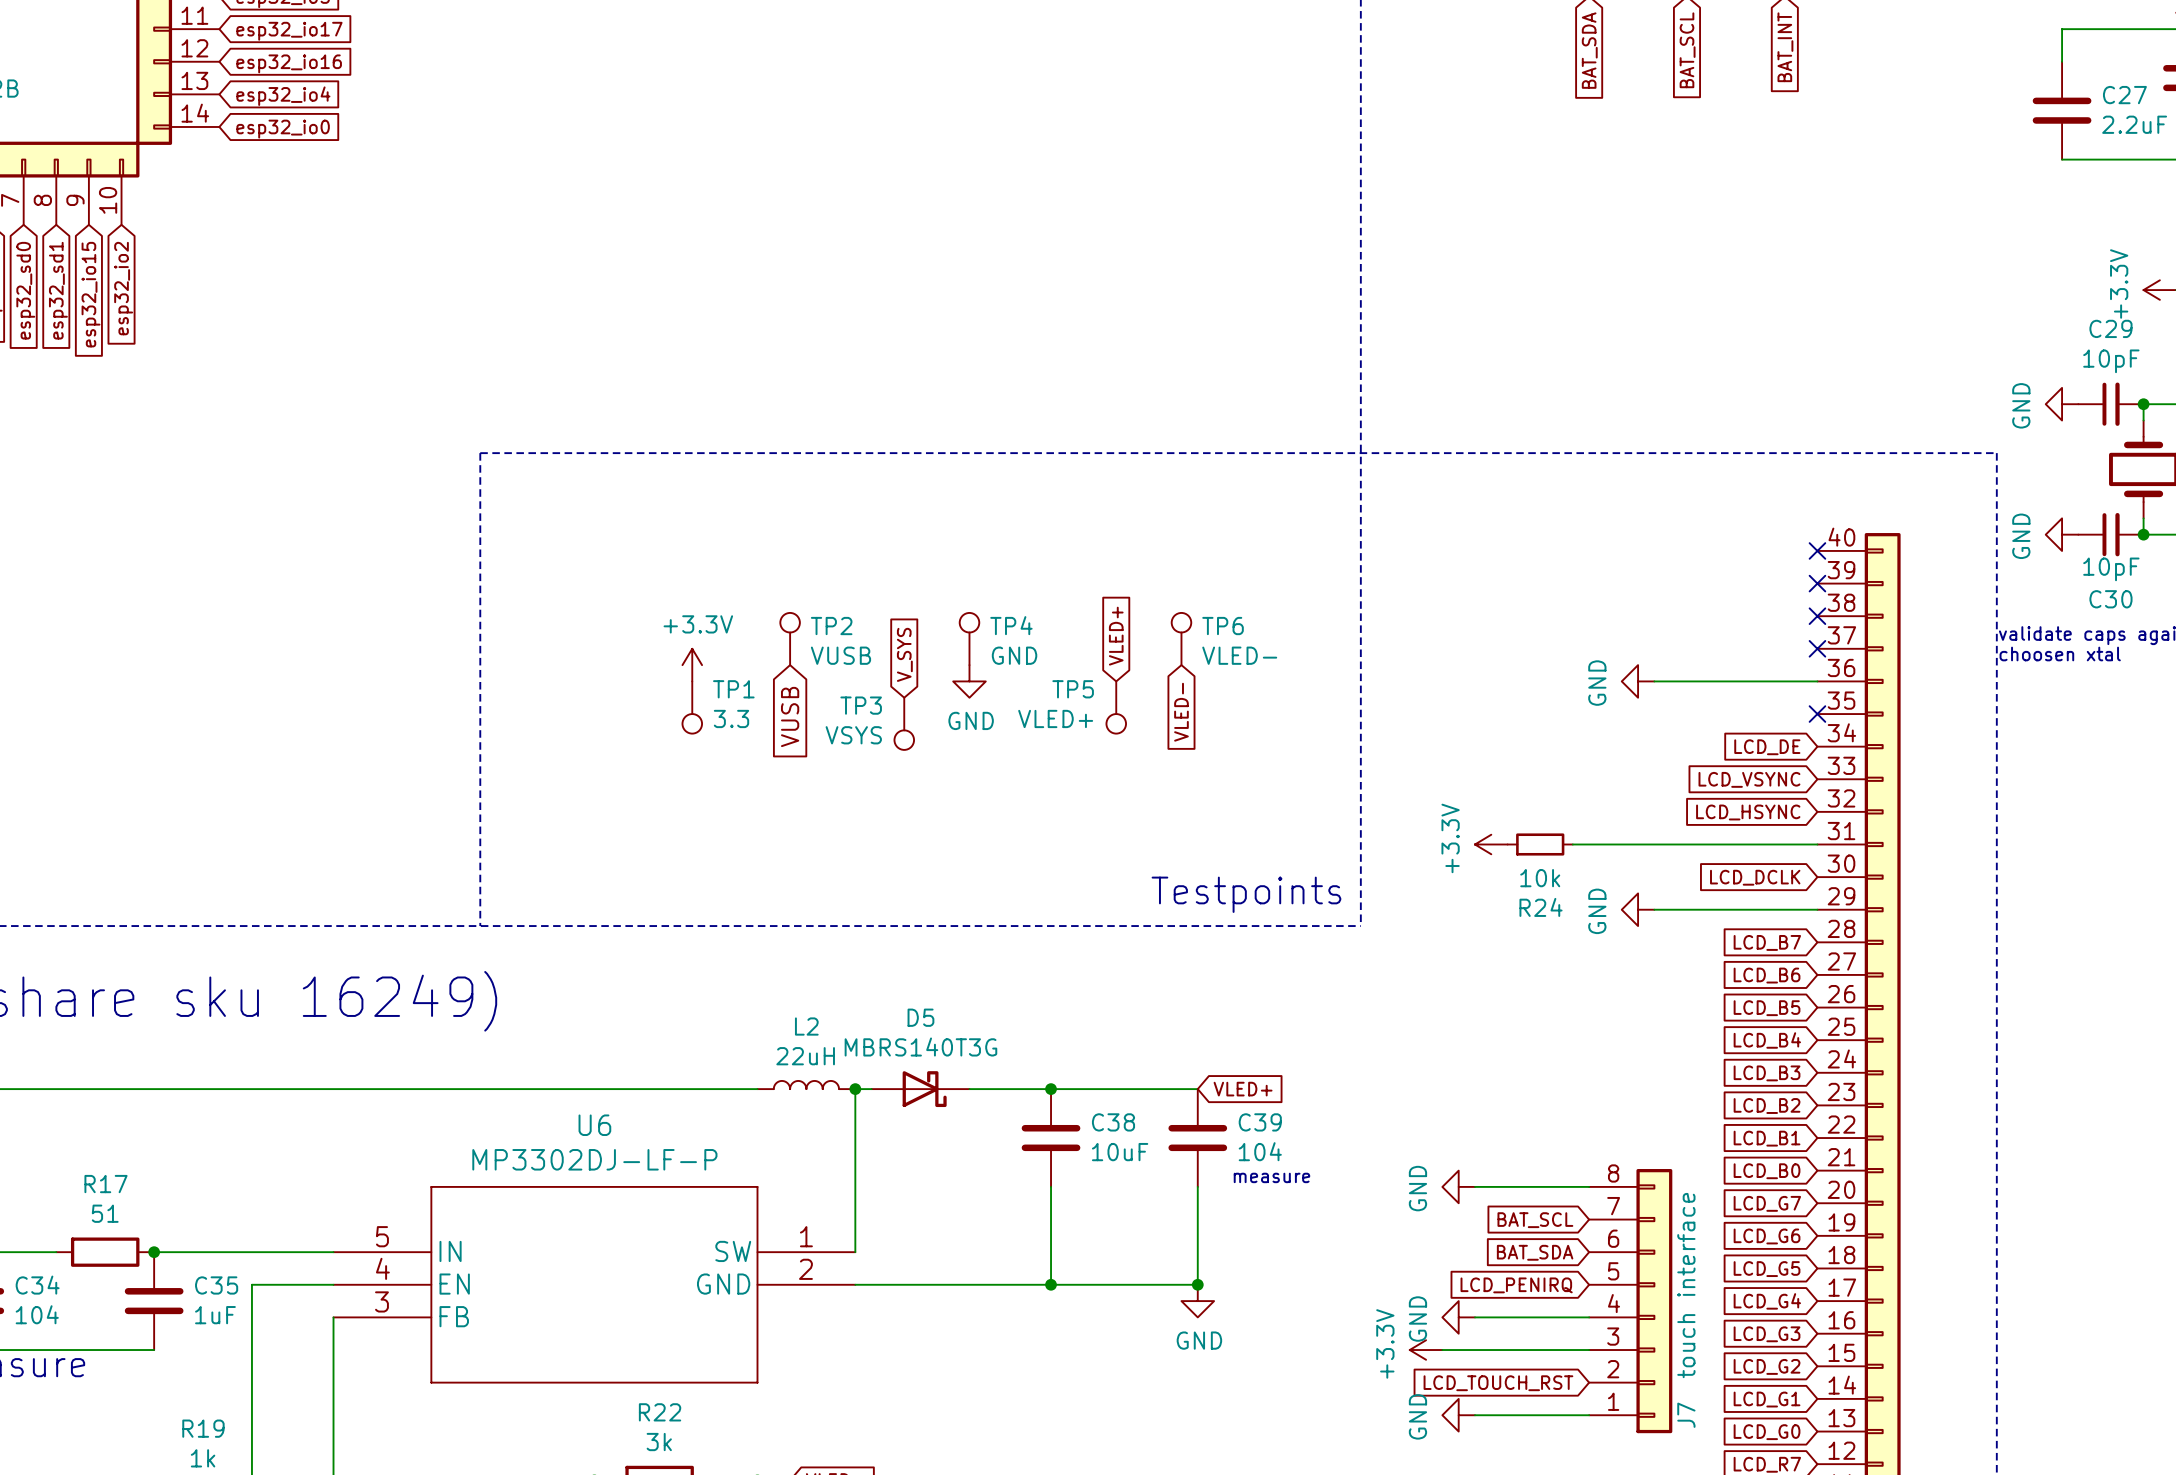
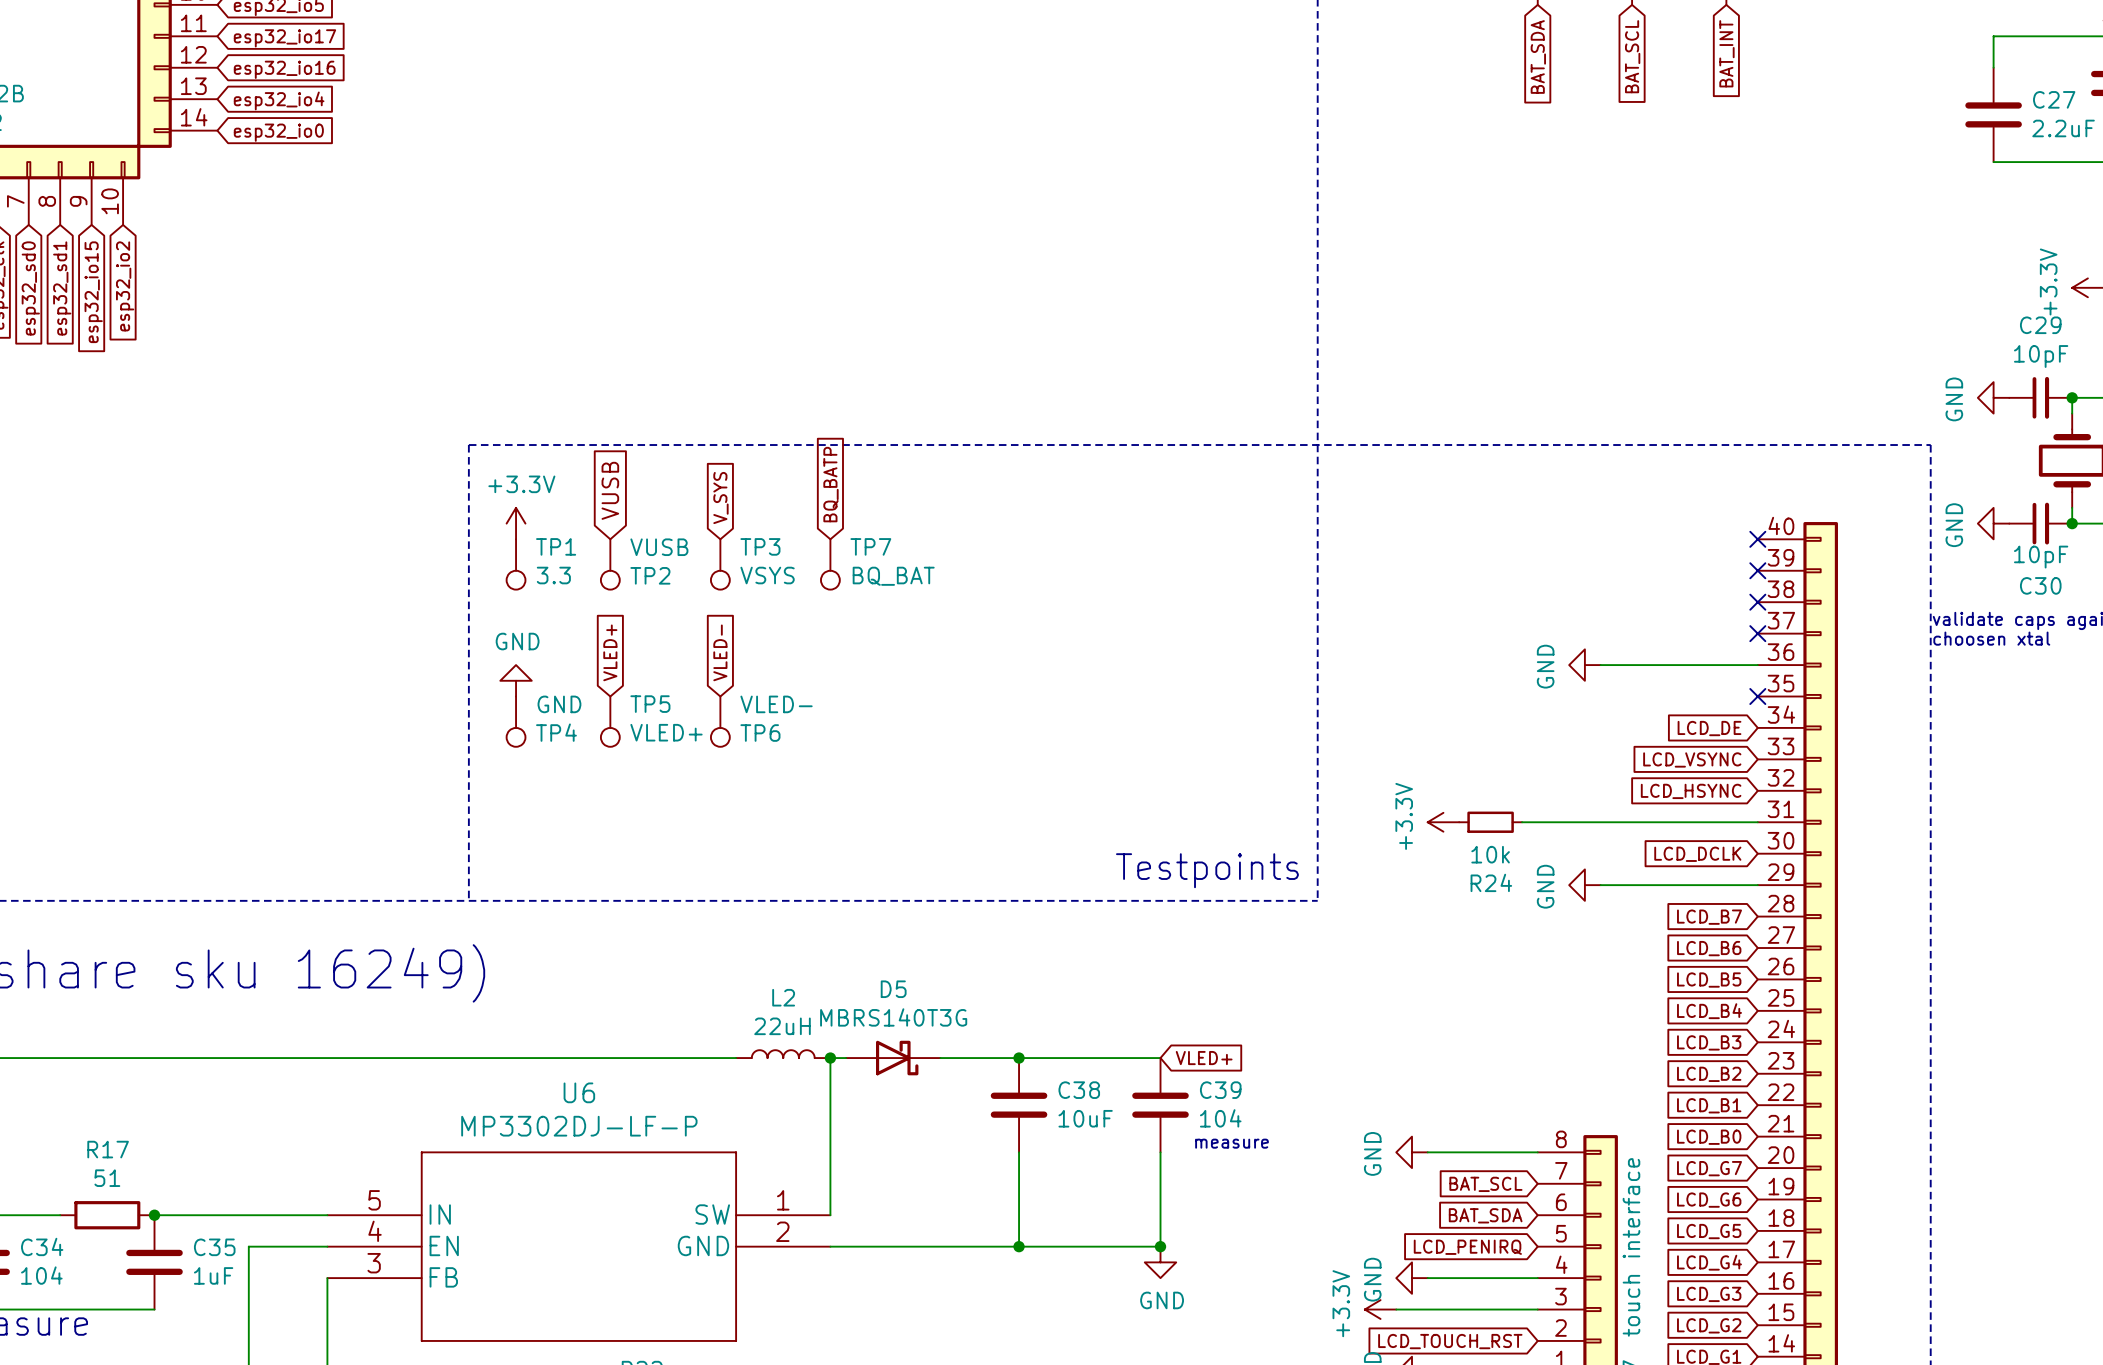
global label: none -> BQ_BATP (830, 484)
TP7: none -> BQ_BAT (830, 564)
TP2 rotation: 0° (790, 622) -> 180° (610, 580)
TP4 rotation: 0° (969, 622) -> 180° (516, 737)
TP6 rotation: 0° (1181, 622) -> 180° (720, 737)
global label: VLED+ (1116, 636) -> none
TP2 position: (790, 639) -> (610, 564)
TP4 position: (969, 639) -> (516, 721)
TP6 position: (1181, 639) -> (720, 721)
global label position: V_SYS (904, 654) -> V_SYS (720, 498)
TP2 value position: VUSB (840, 655) -> VUSB (659, 547)
TP4 value position: GND (1014, 655) -> GND (559, 704)
TP6 value position: VLED- (1239, 655) -> VLED- (776, 704)
power symbol position: +3.3V (692, 665) -> +3.3V (516, 523)
global label: none -> VLED+ (610, 652)
global label: none -> VLED- (720, 652)
power symbol: GND (969, 681) -> none
TP5 name position: TP5 (1073, 689) -> TP5 (650, 704)
power symbol: none -> GND (516, 680)
TP3 name position: TP3 (861, 705) -> TP3 (760, 546)
TP1 position: (692, 707) -> (516, 564)
TP5 position: (1116, 707) -> (610, 721)
global label: VLED- (1181, 712) -> none
global label rotation: 0° (790, 716) -> 180° (610, 490)
global label position: VUSB (790, 716) -> VUSB (610, 490)
TP5 value position: VLED+ (1055, 718) -> VLED+ (666, 732)
TP3 position: (904, 723) -> (720, 564)
TP3 value position: VSYS (853, 735) -> VSYS (767, 575)

